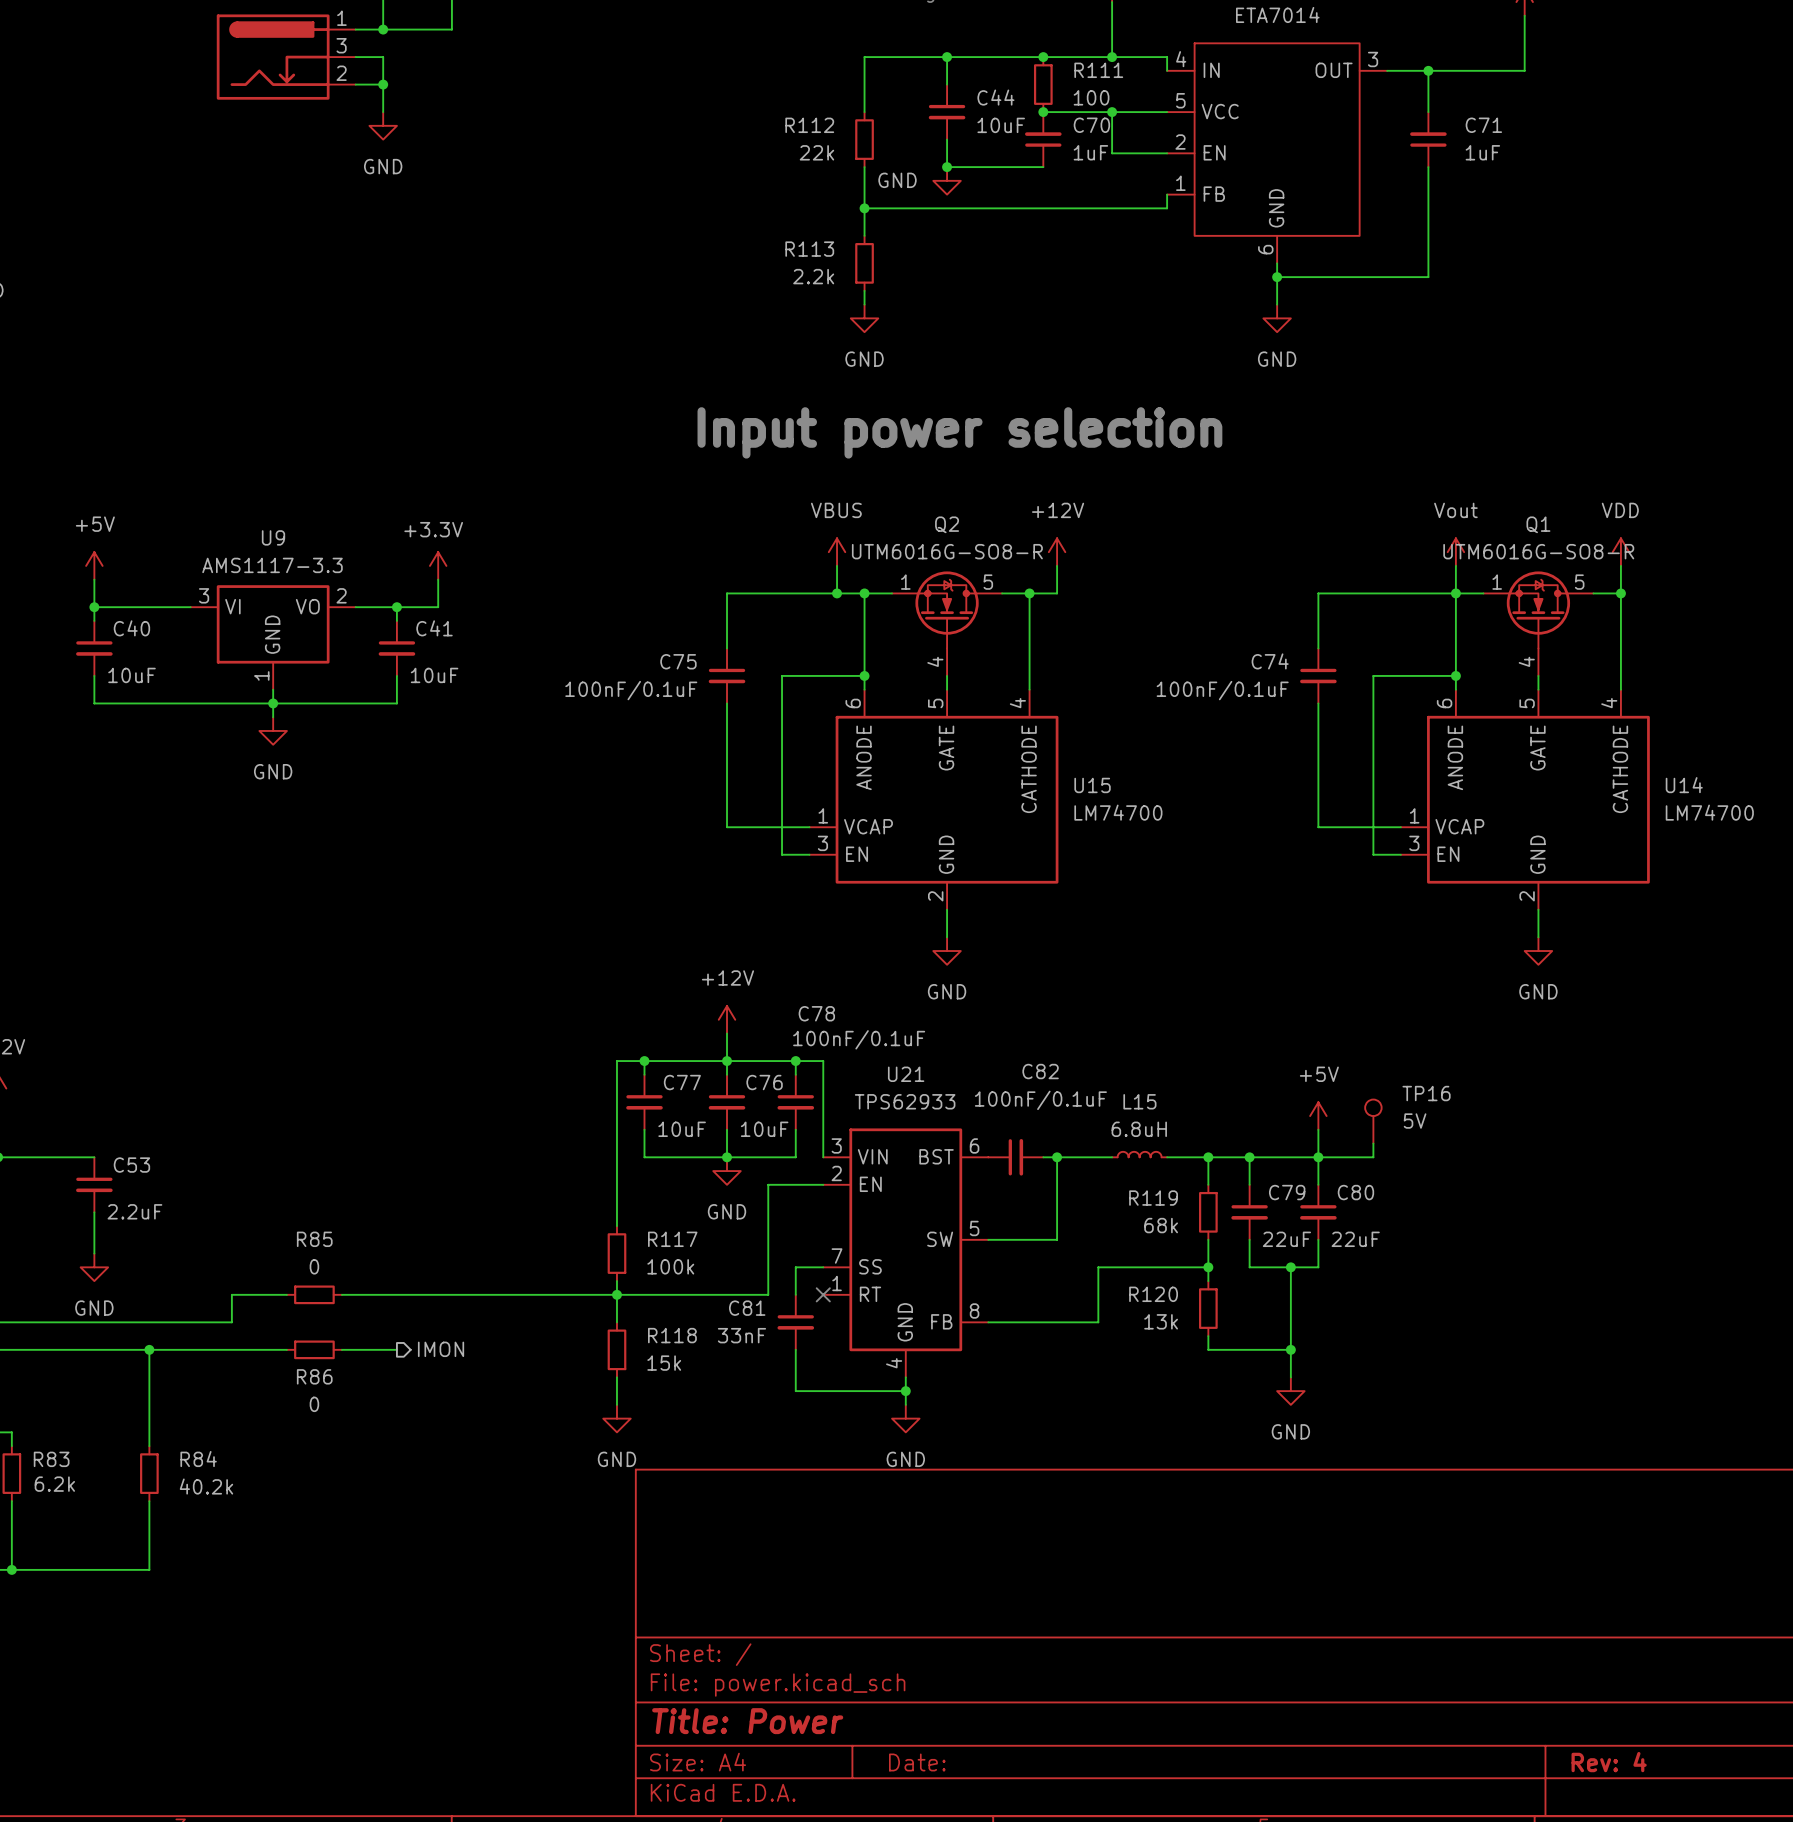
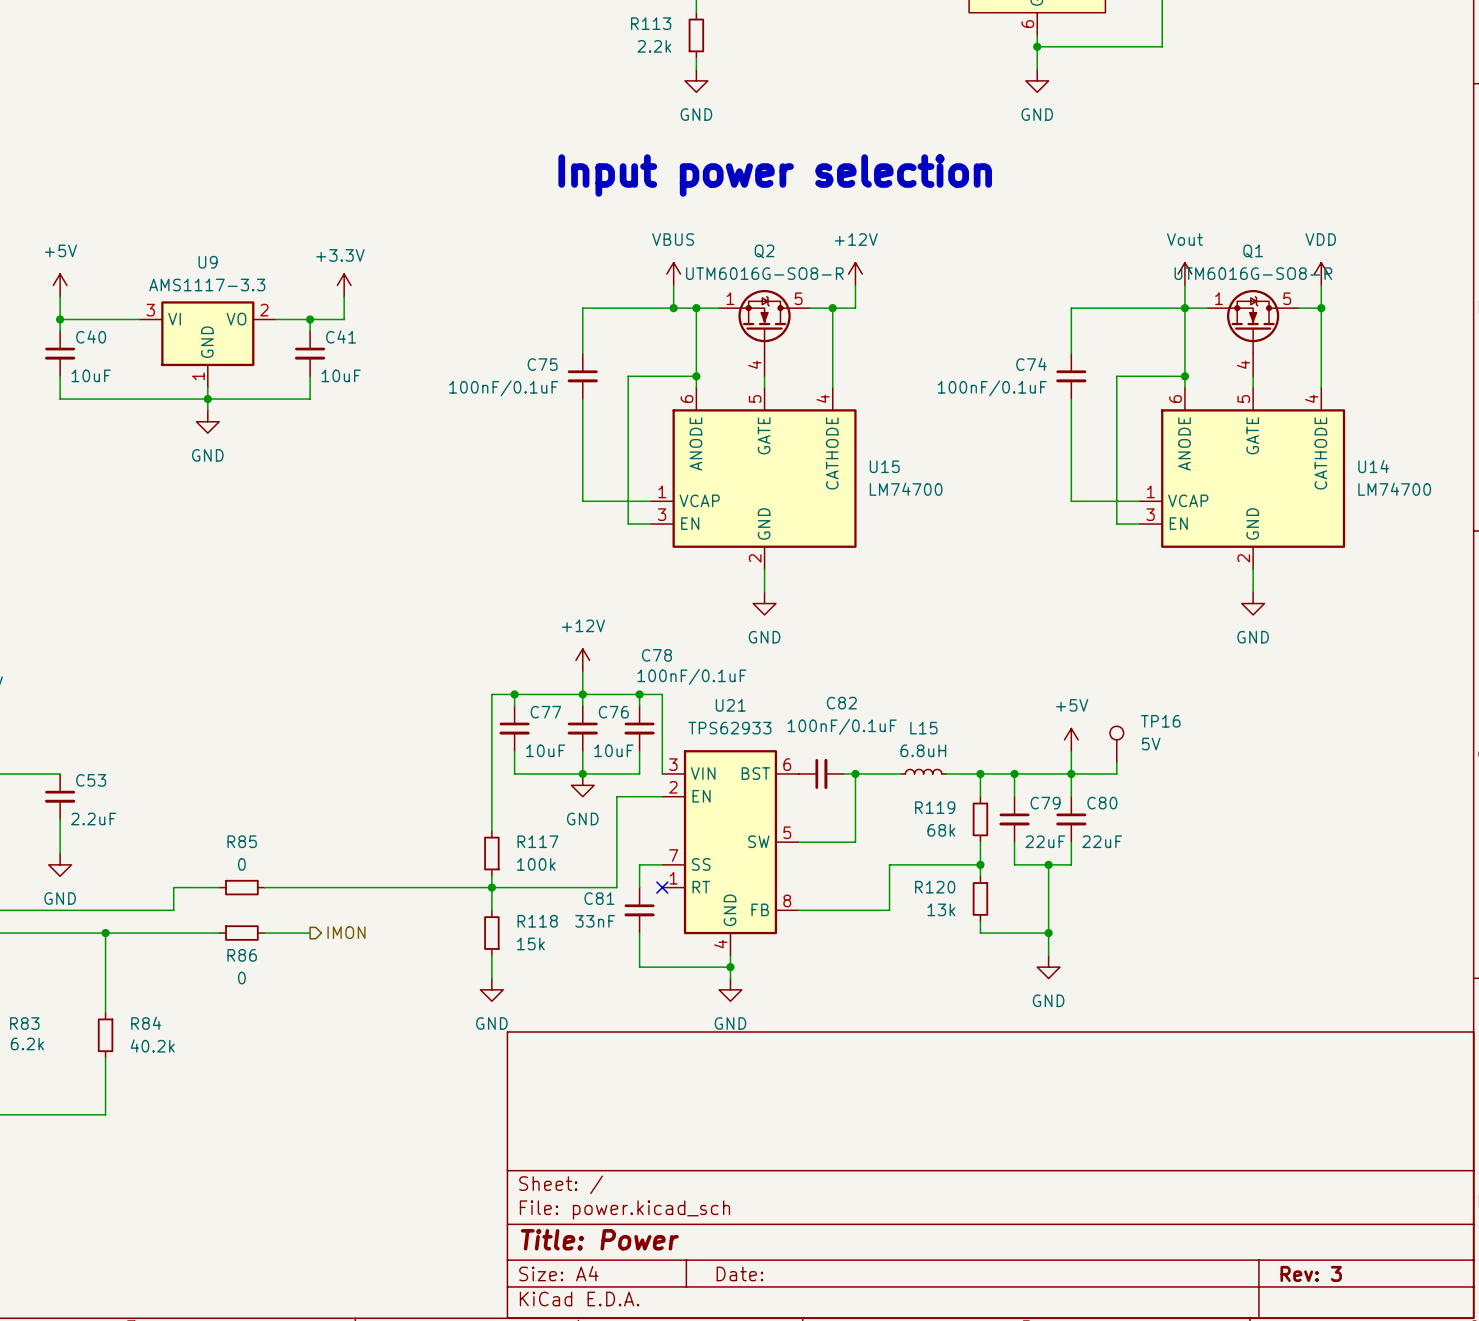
title block: Rev: 4 (1609, 1762) -> Rev: 3 (1311, 1273)

